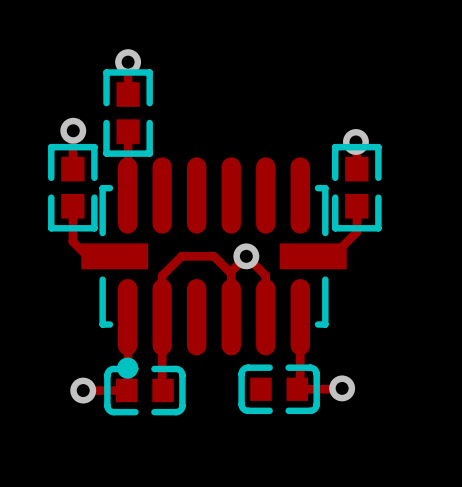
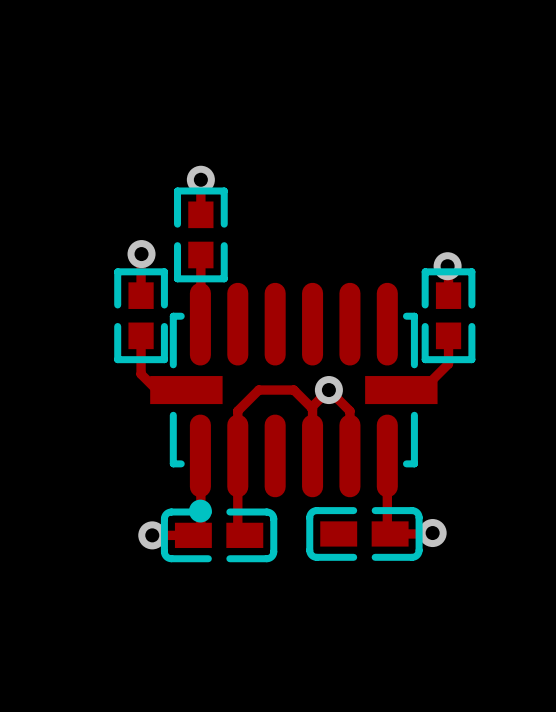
part footprint: [238, 364, 320, 415] -> [306, 507, 423, 561]
part footprint: [104, 365, 186, 416] -> [160, 508, 278, 563]

